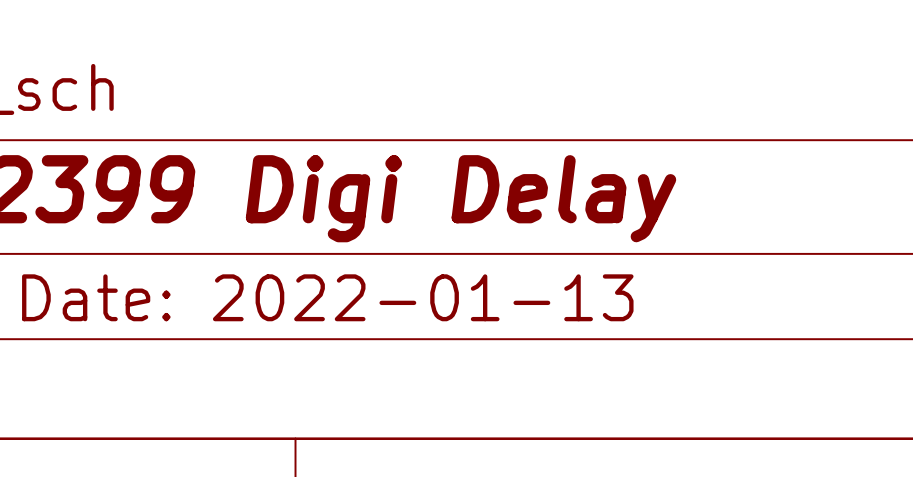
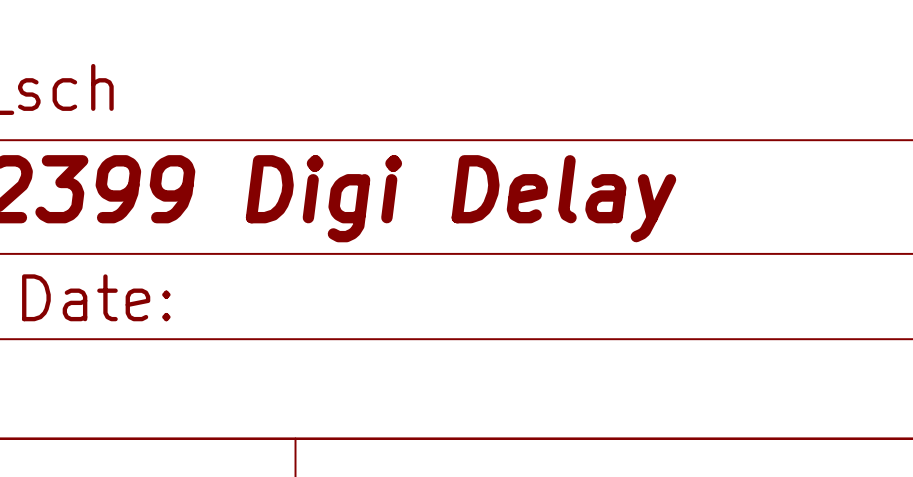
title block: Date: 2022-01-13 (327, 297) -> Date: (96, 297)

